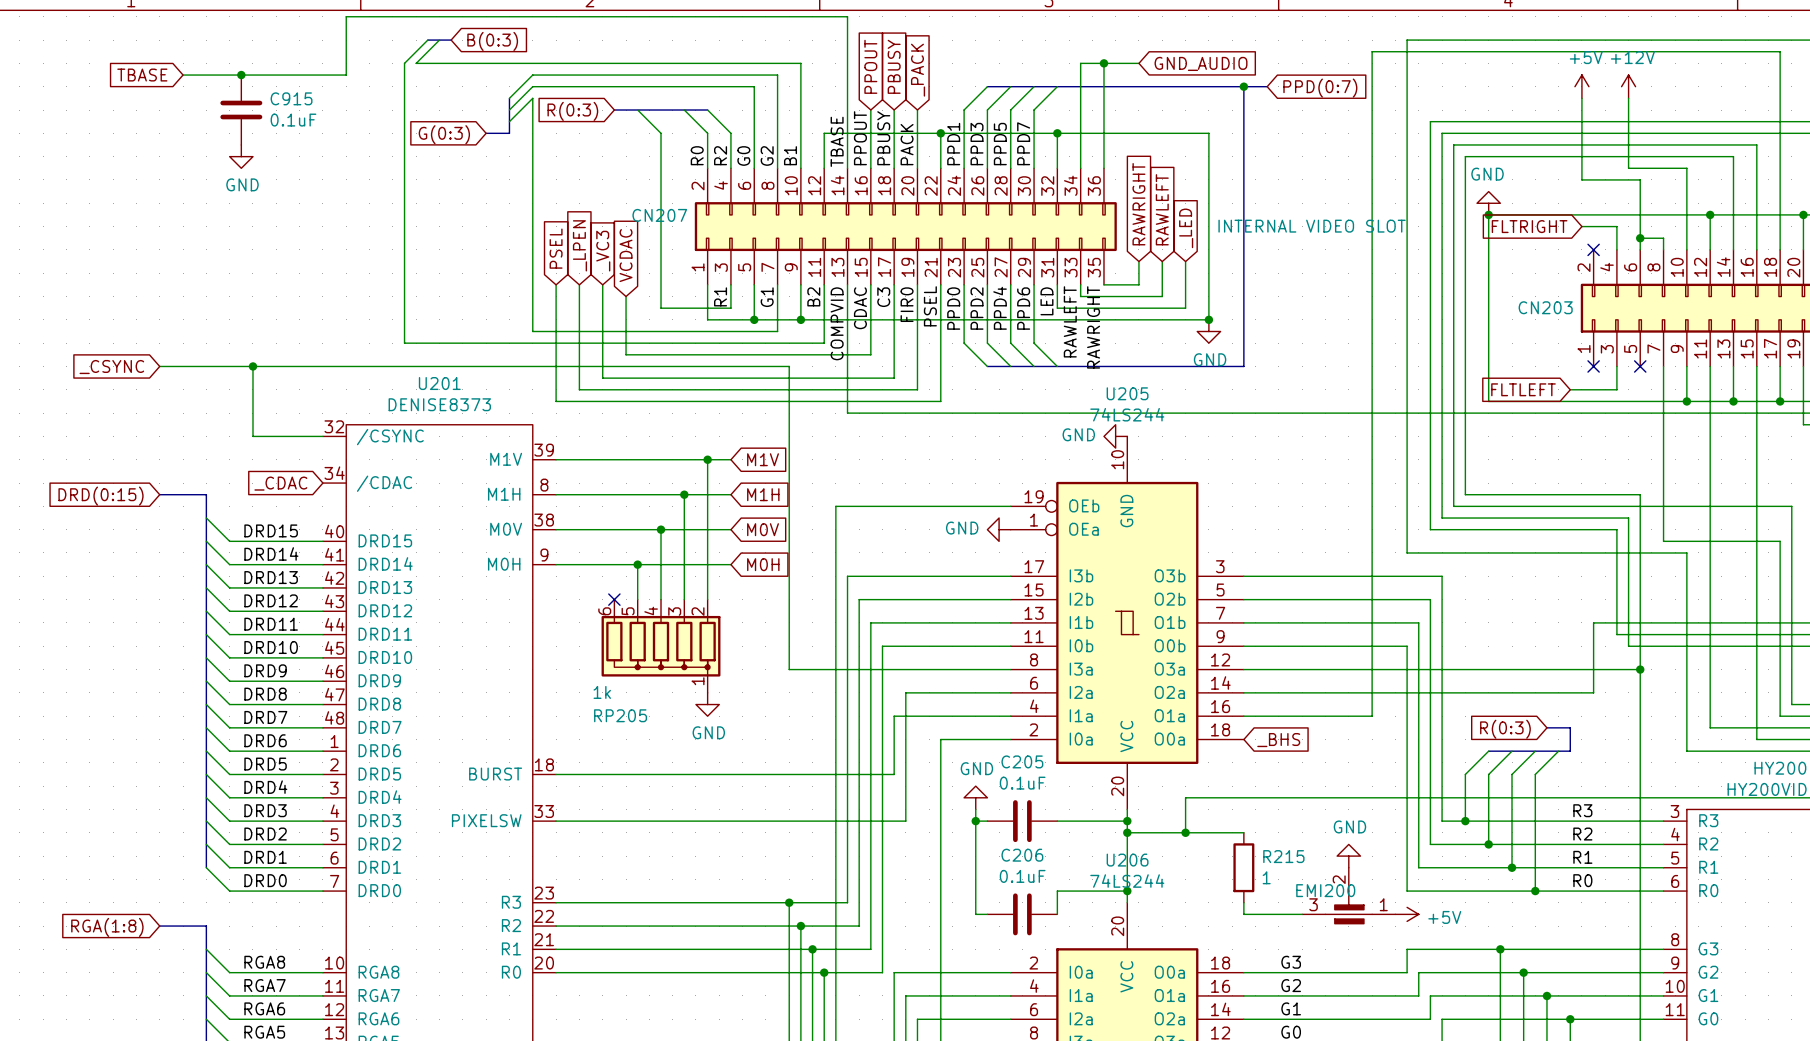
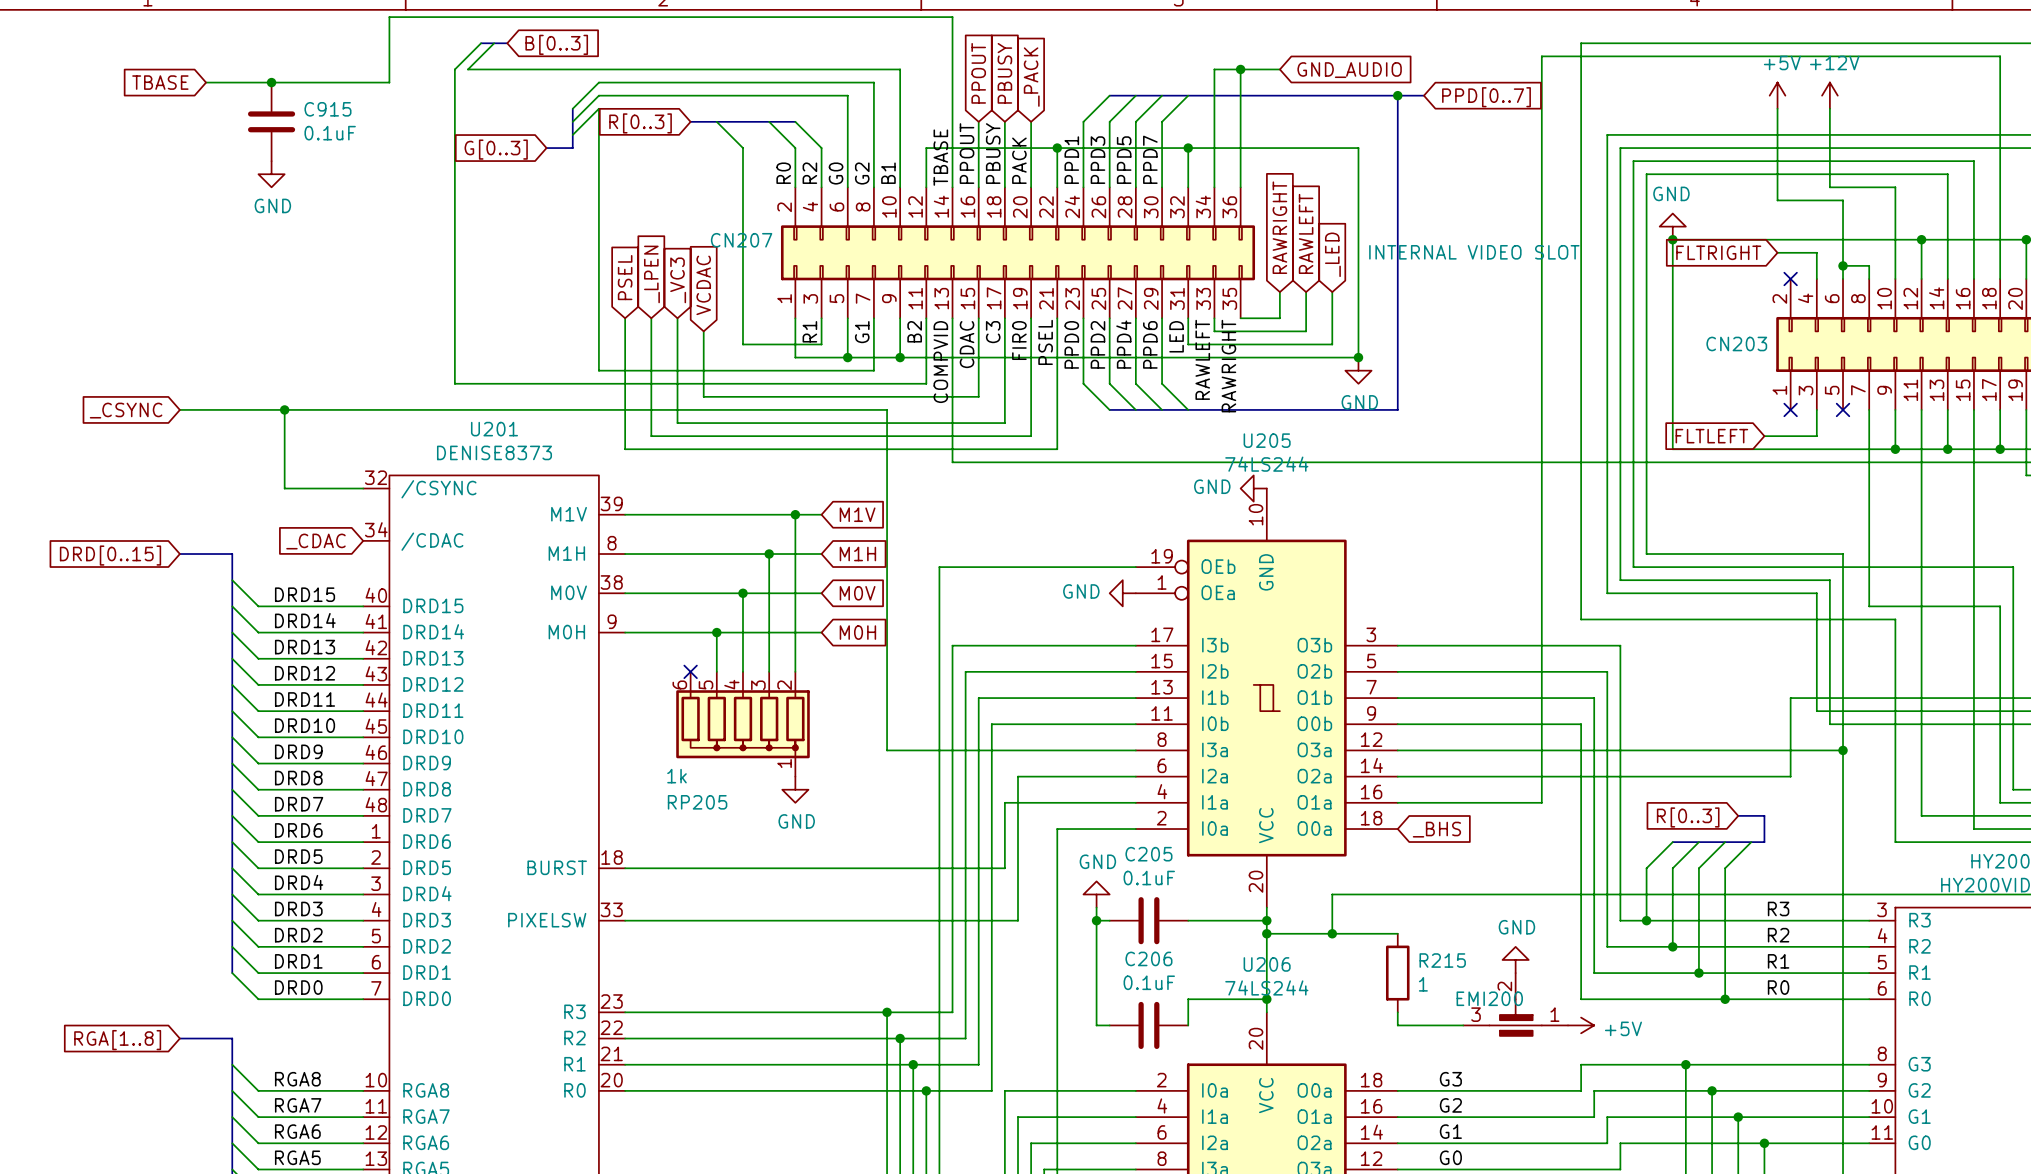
global label: B(0:3) (492, 41) -> B[0..3] (556, 44)
global label: PPD(0:7) (1320, 88) -> PPD[0..7] (1486, 97)
global label: R(0:3) (572, 111) -> R[0..3] (640, 123)
global label: G(0:3) (444, 134) -> G[0..3] (496, 149)
global label: DRD(0:15) (101, 496) -> DRD[0..15] (110, 555)
global label: R(0:3) (1505, 729) -> R[0..3] (1688, 817)
global label: RGA(1:8) (107, 927) -> RGA[1..8] (117, 1040)

